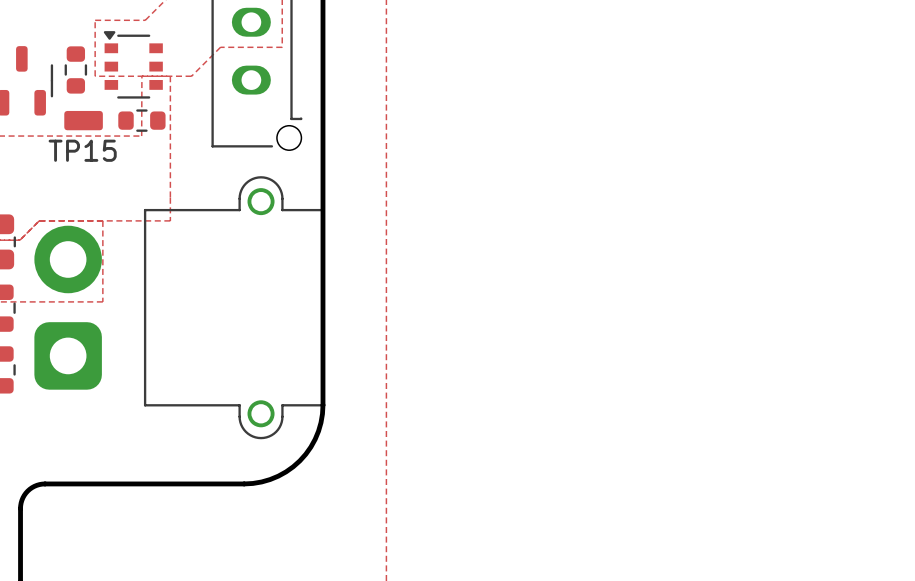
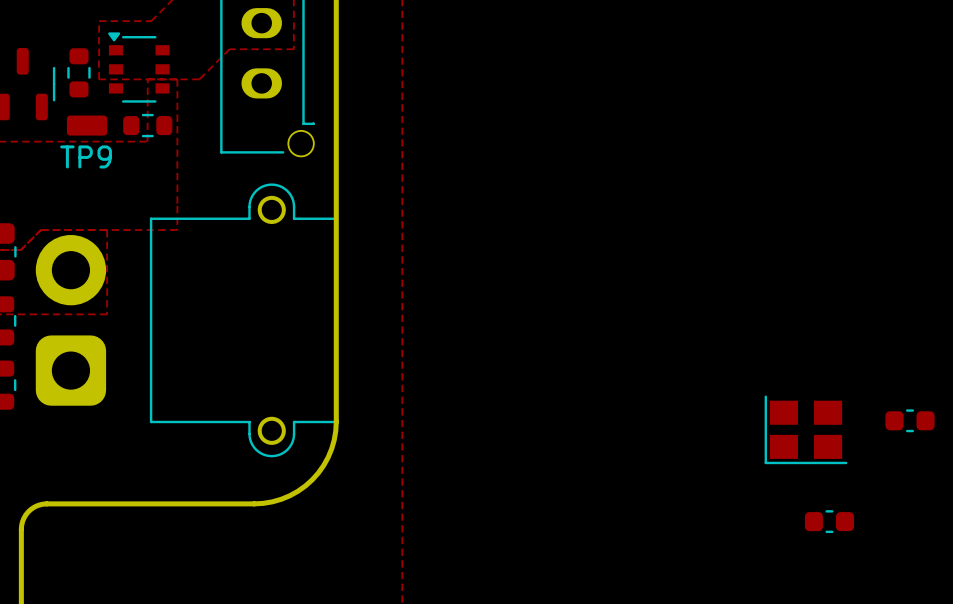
TP15 name: TP15 (82, 150) -> TP9 (86, 156)
part: none -> (910, 420)
part: none -> (805, 429)
part: none -> (829, 521)

